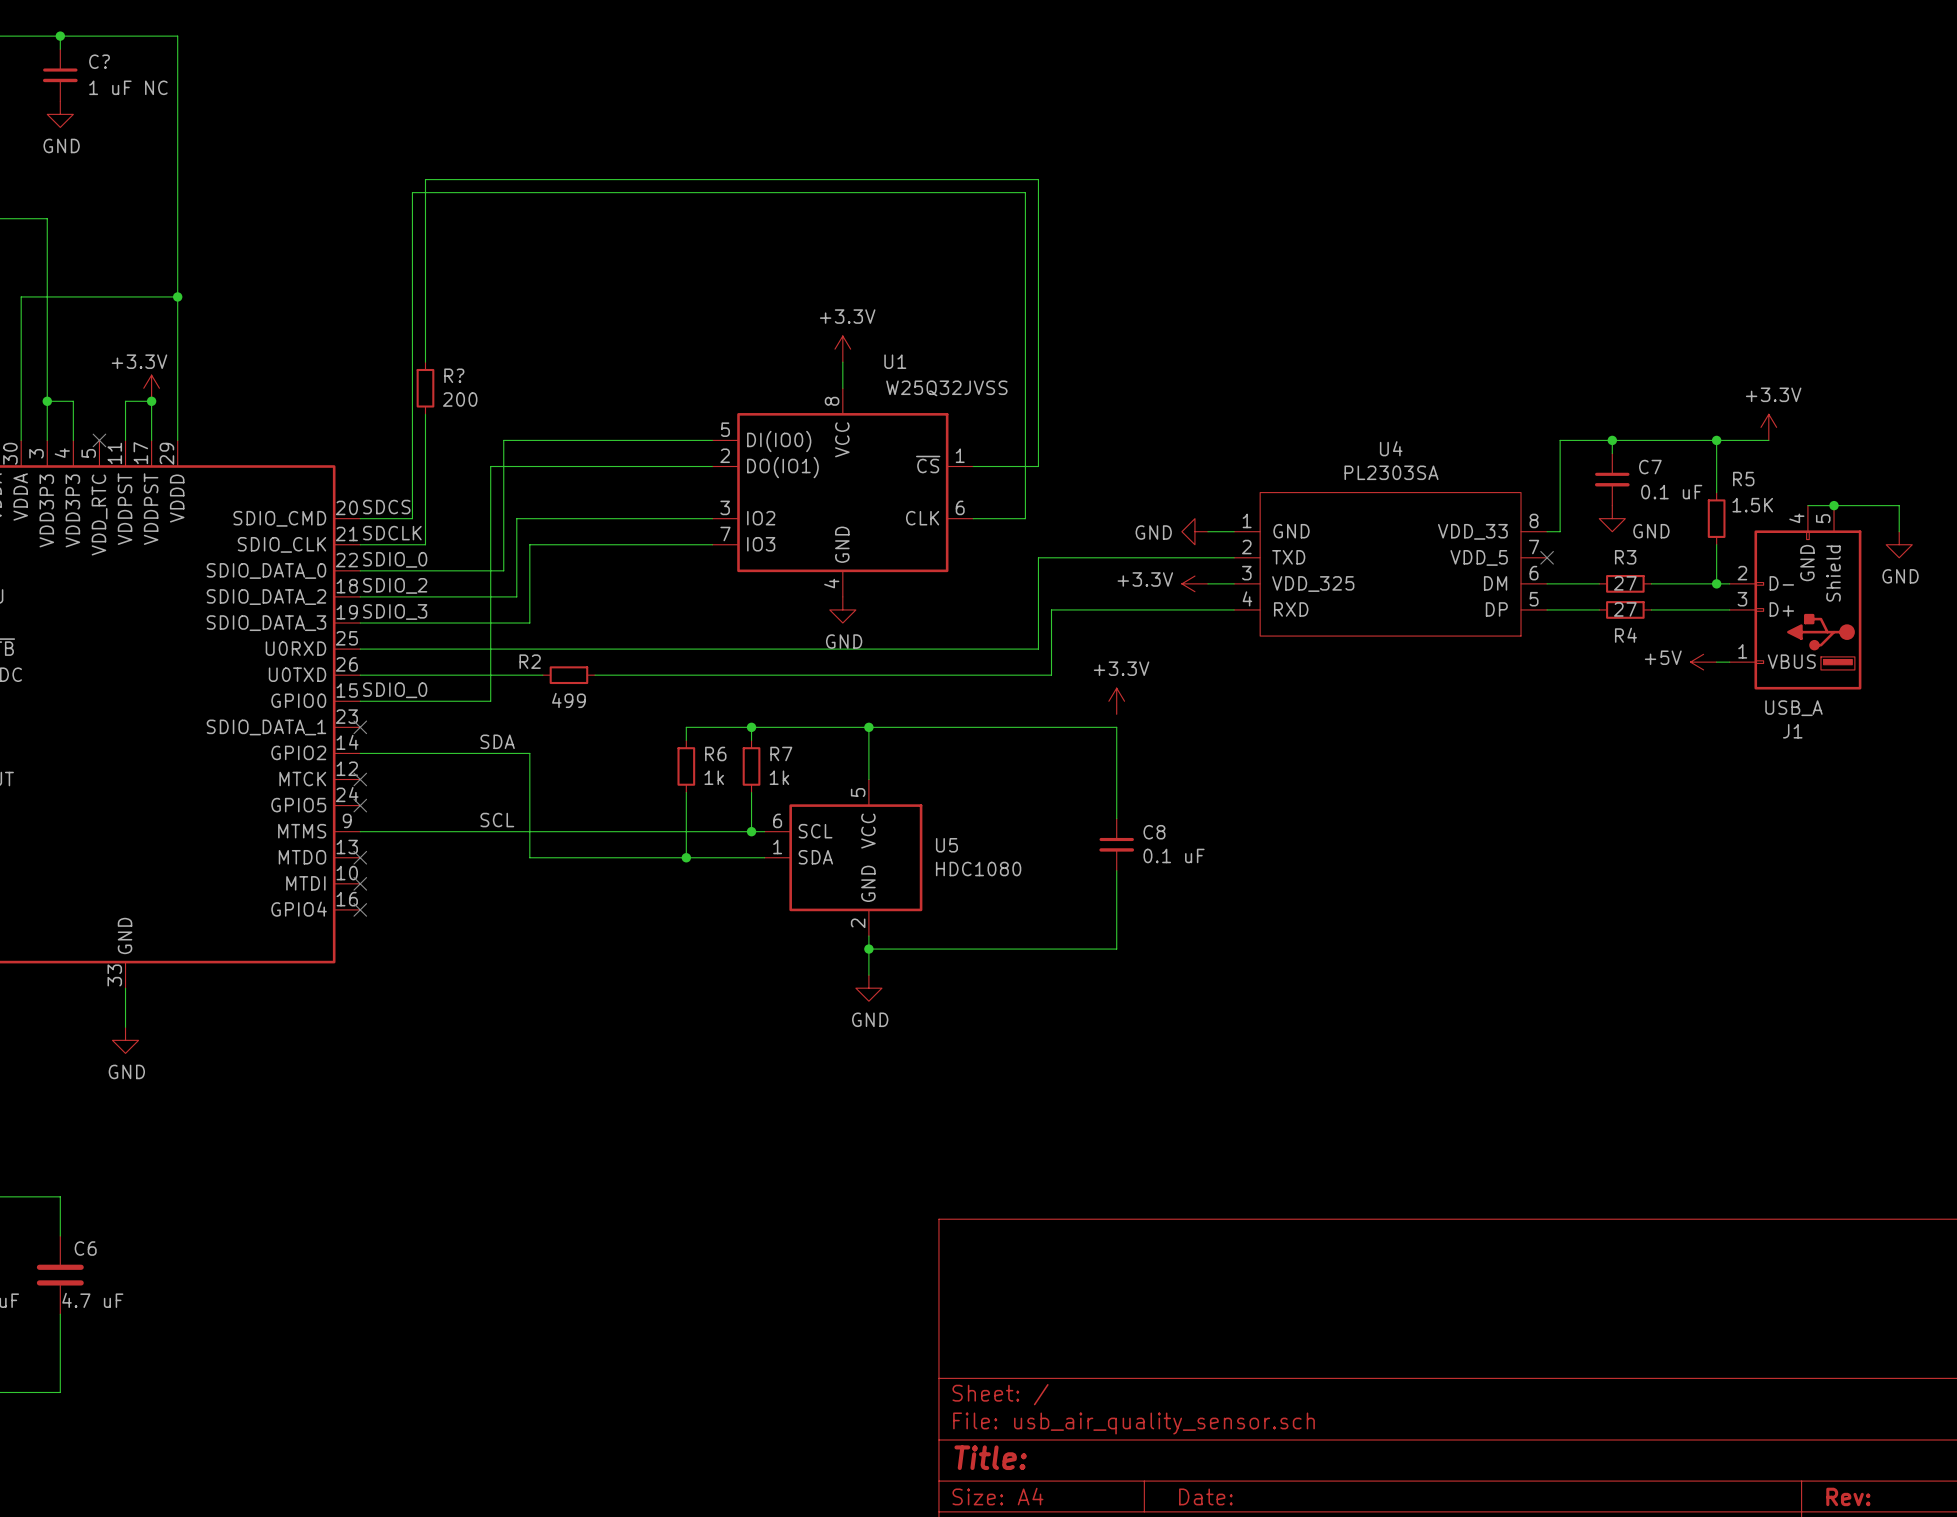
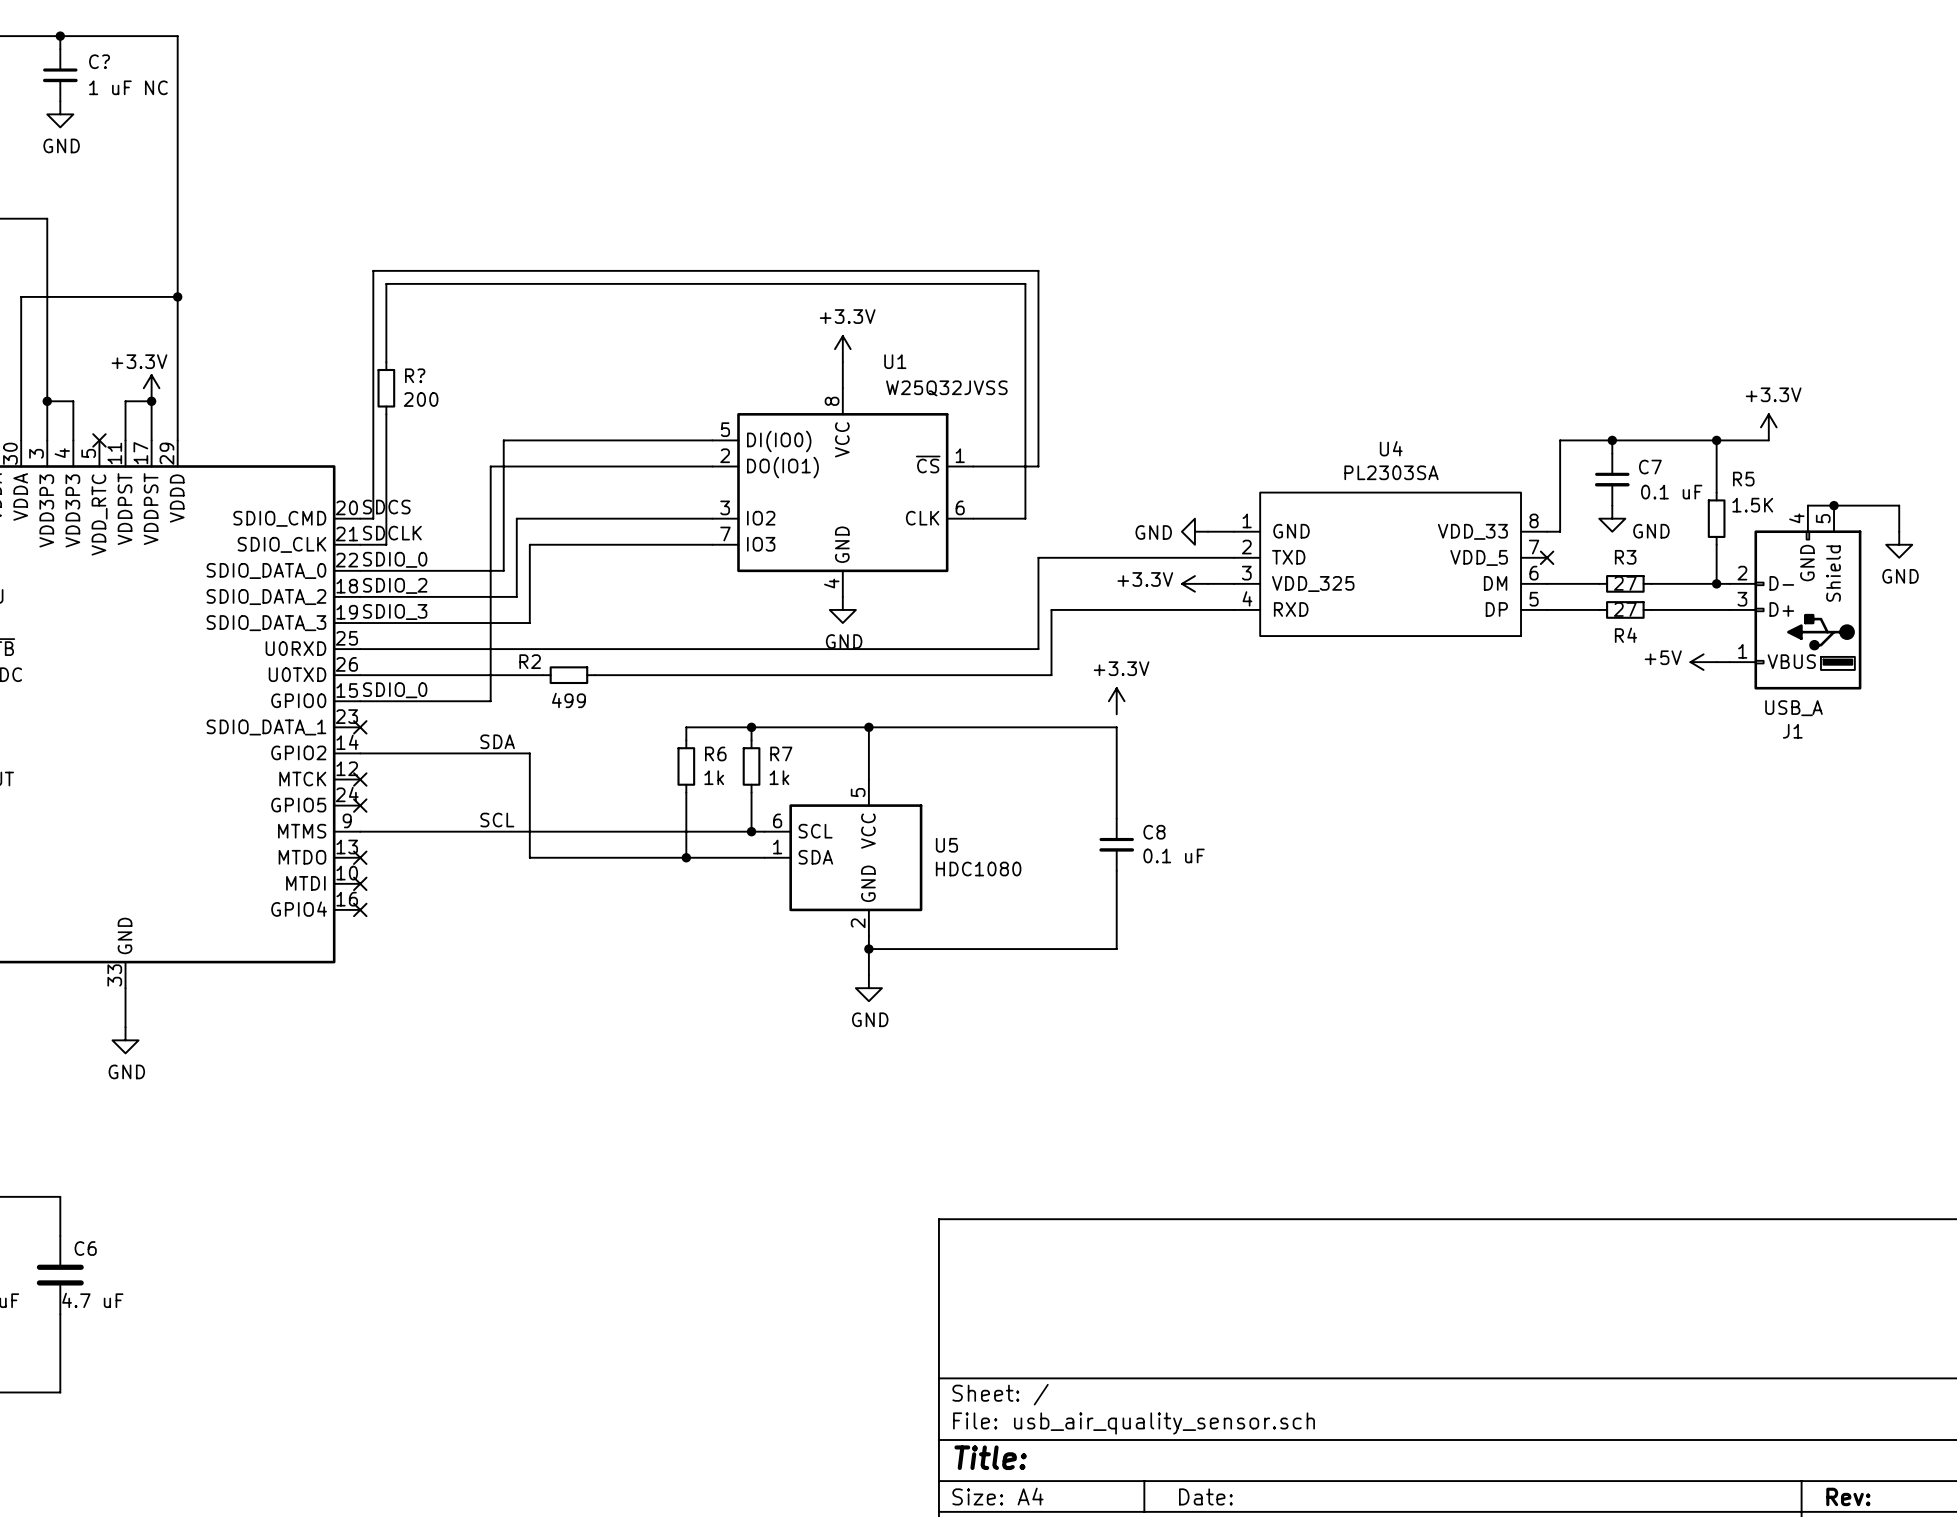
wire: (1038, 270) (1038, 179) (425, 179) (425, 362) -> none
wire: (1025, 283) (1025, 192) (412, 192) (412, 518) (373, 518) -> (1038, 270) (373, 270) (373, 518)
wire: none -> (1025, 283) (386, 283) (386, 362)
R? position: (425, 388) -> (386, 388)
wire: (425, 414) (425, 544) (386, 544) -> (386, 414) (386, 544)

